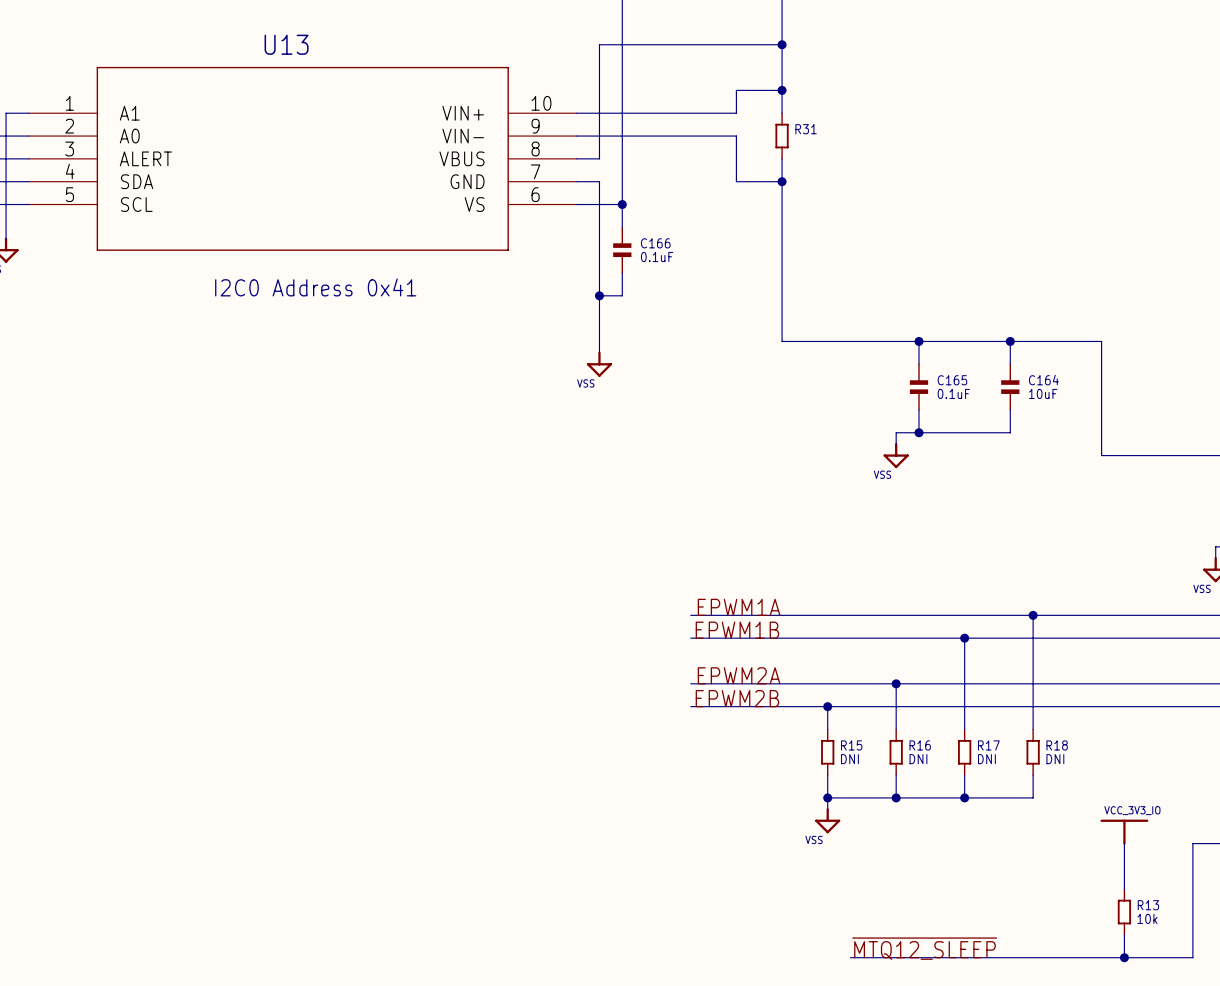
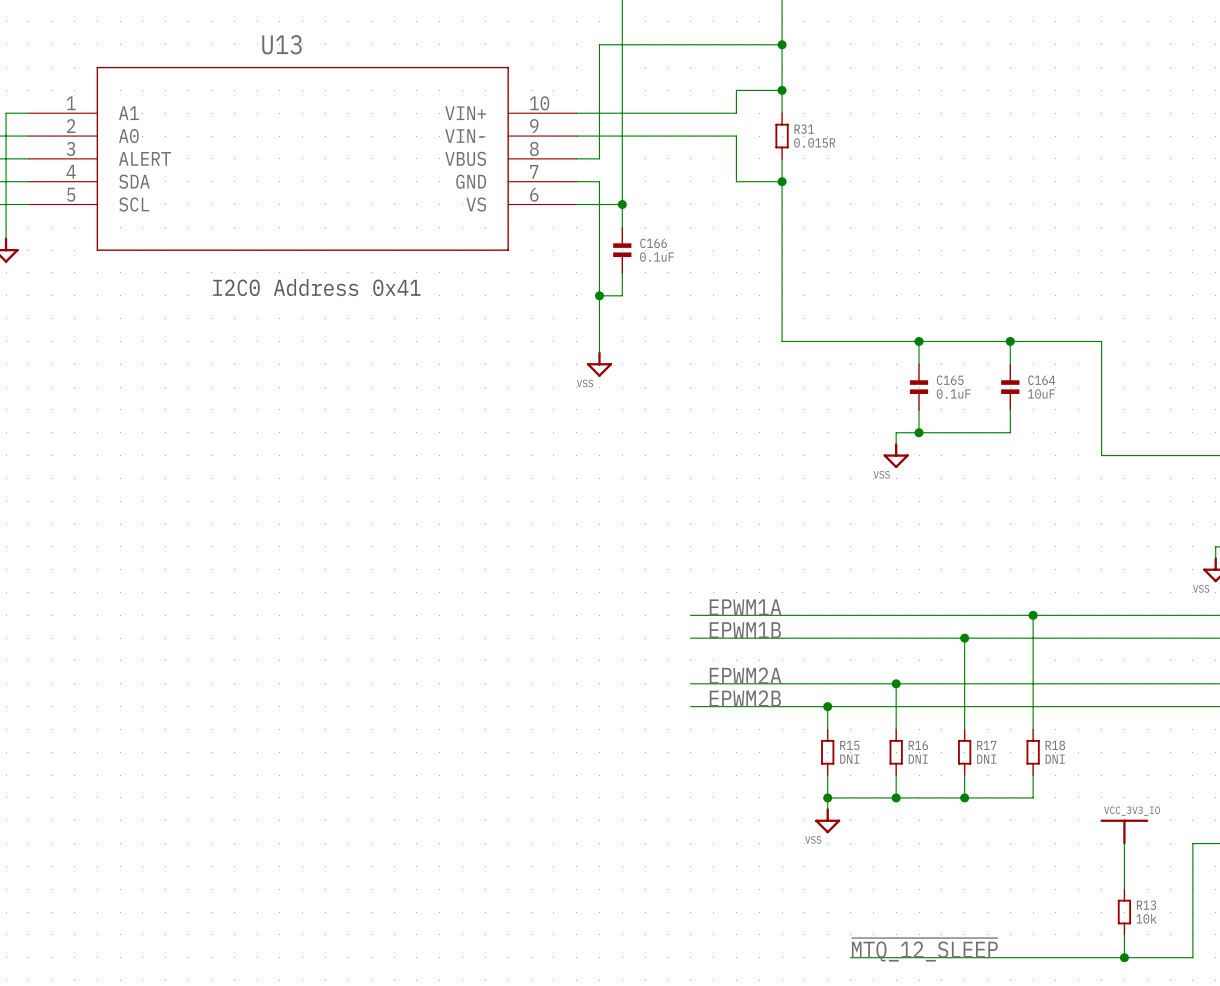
R31 value: none -> 0.015R (814, 142)
label: ~{MTQ12_SLEEP} (924, 948) -> ~{MTQ_12_SLEEP} (924, 949)

